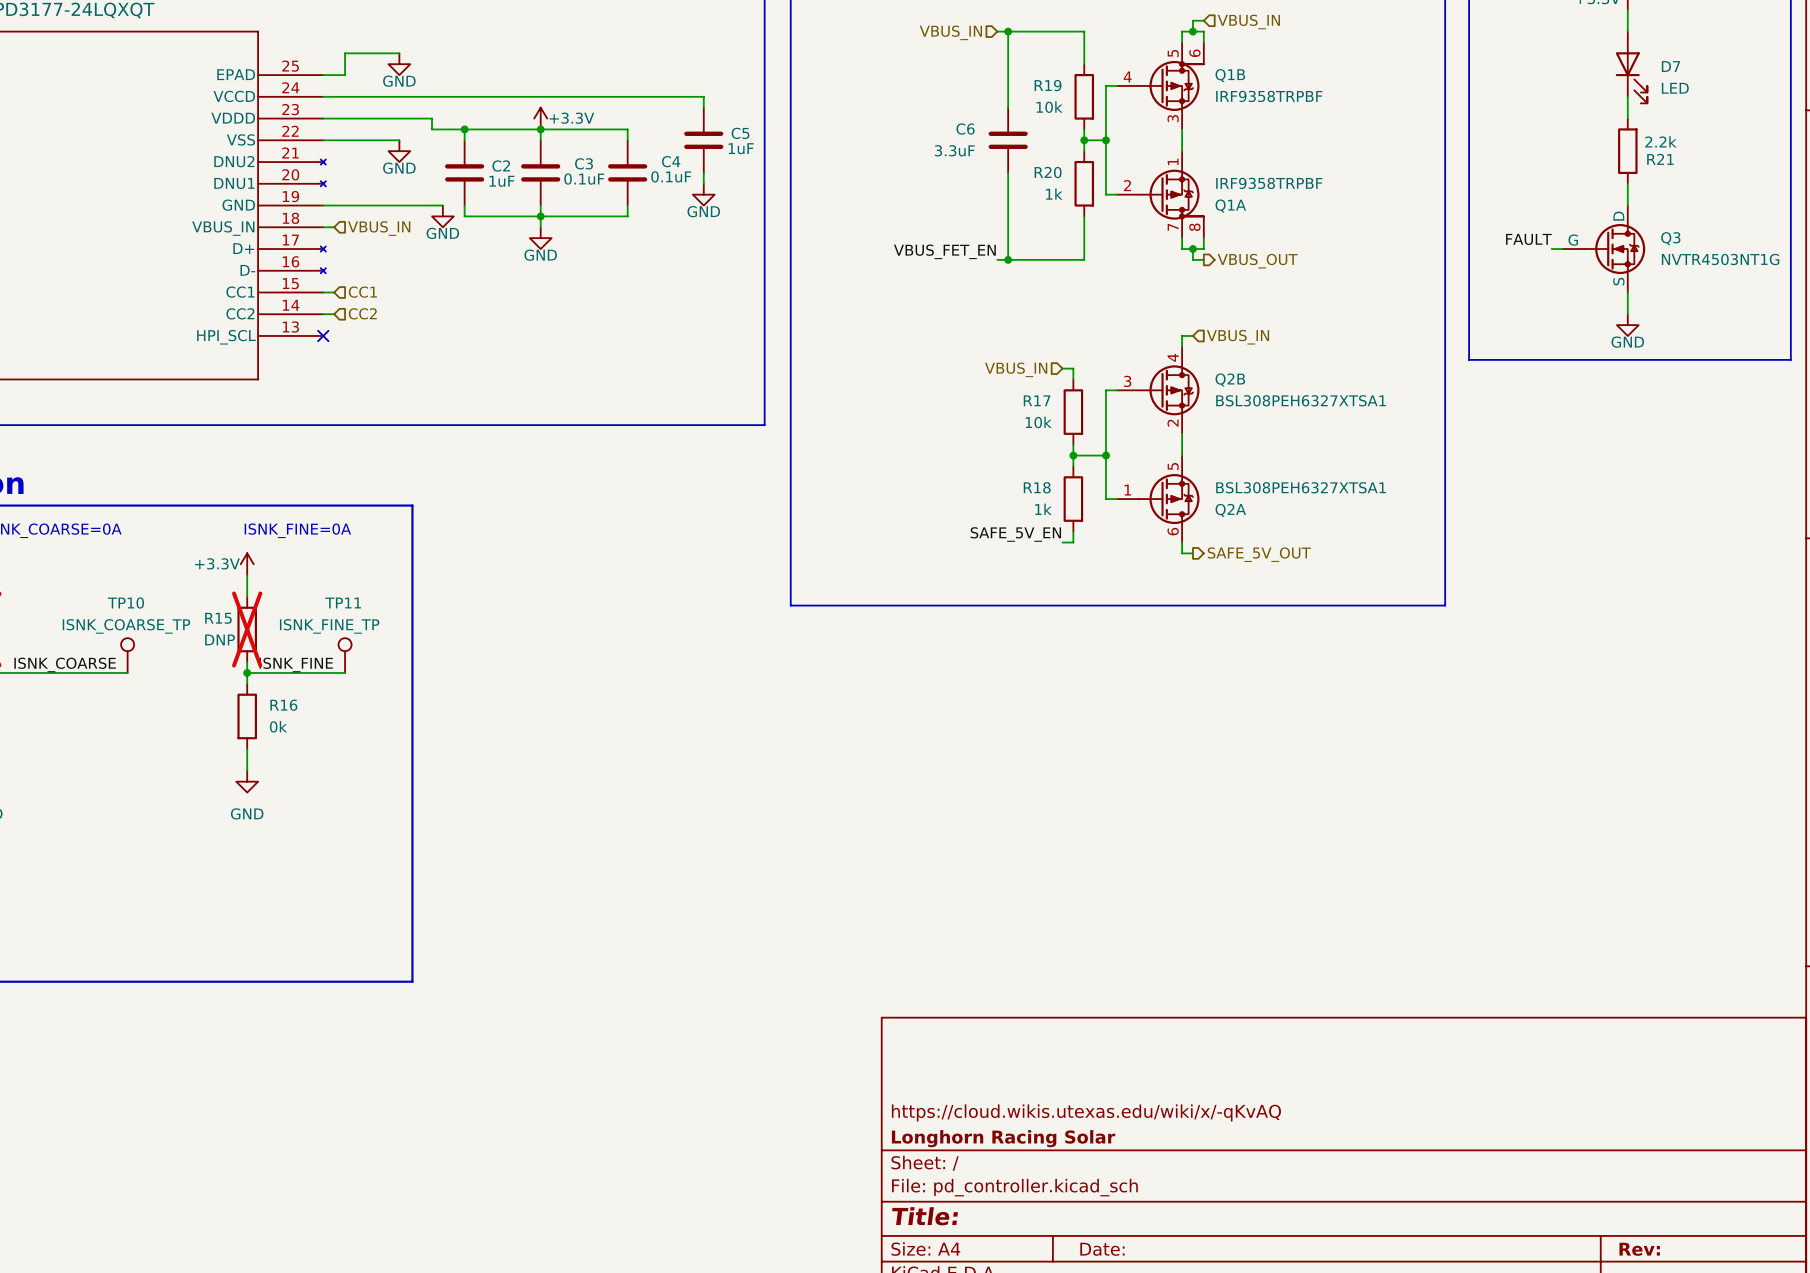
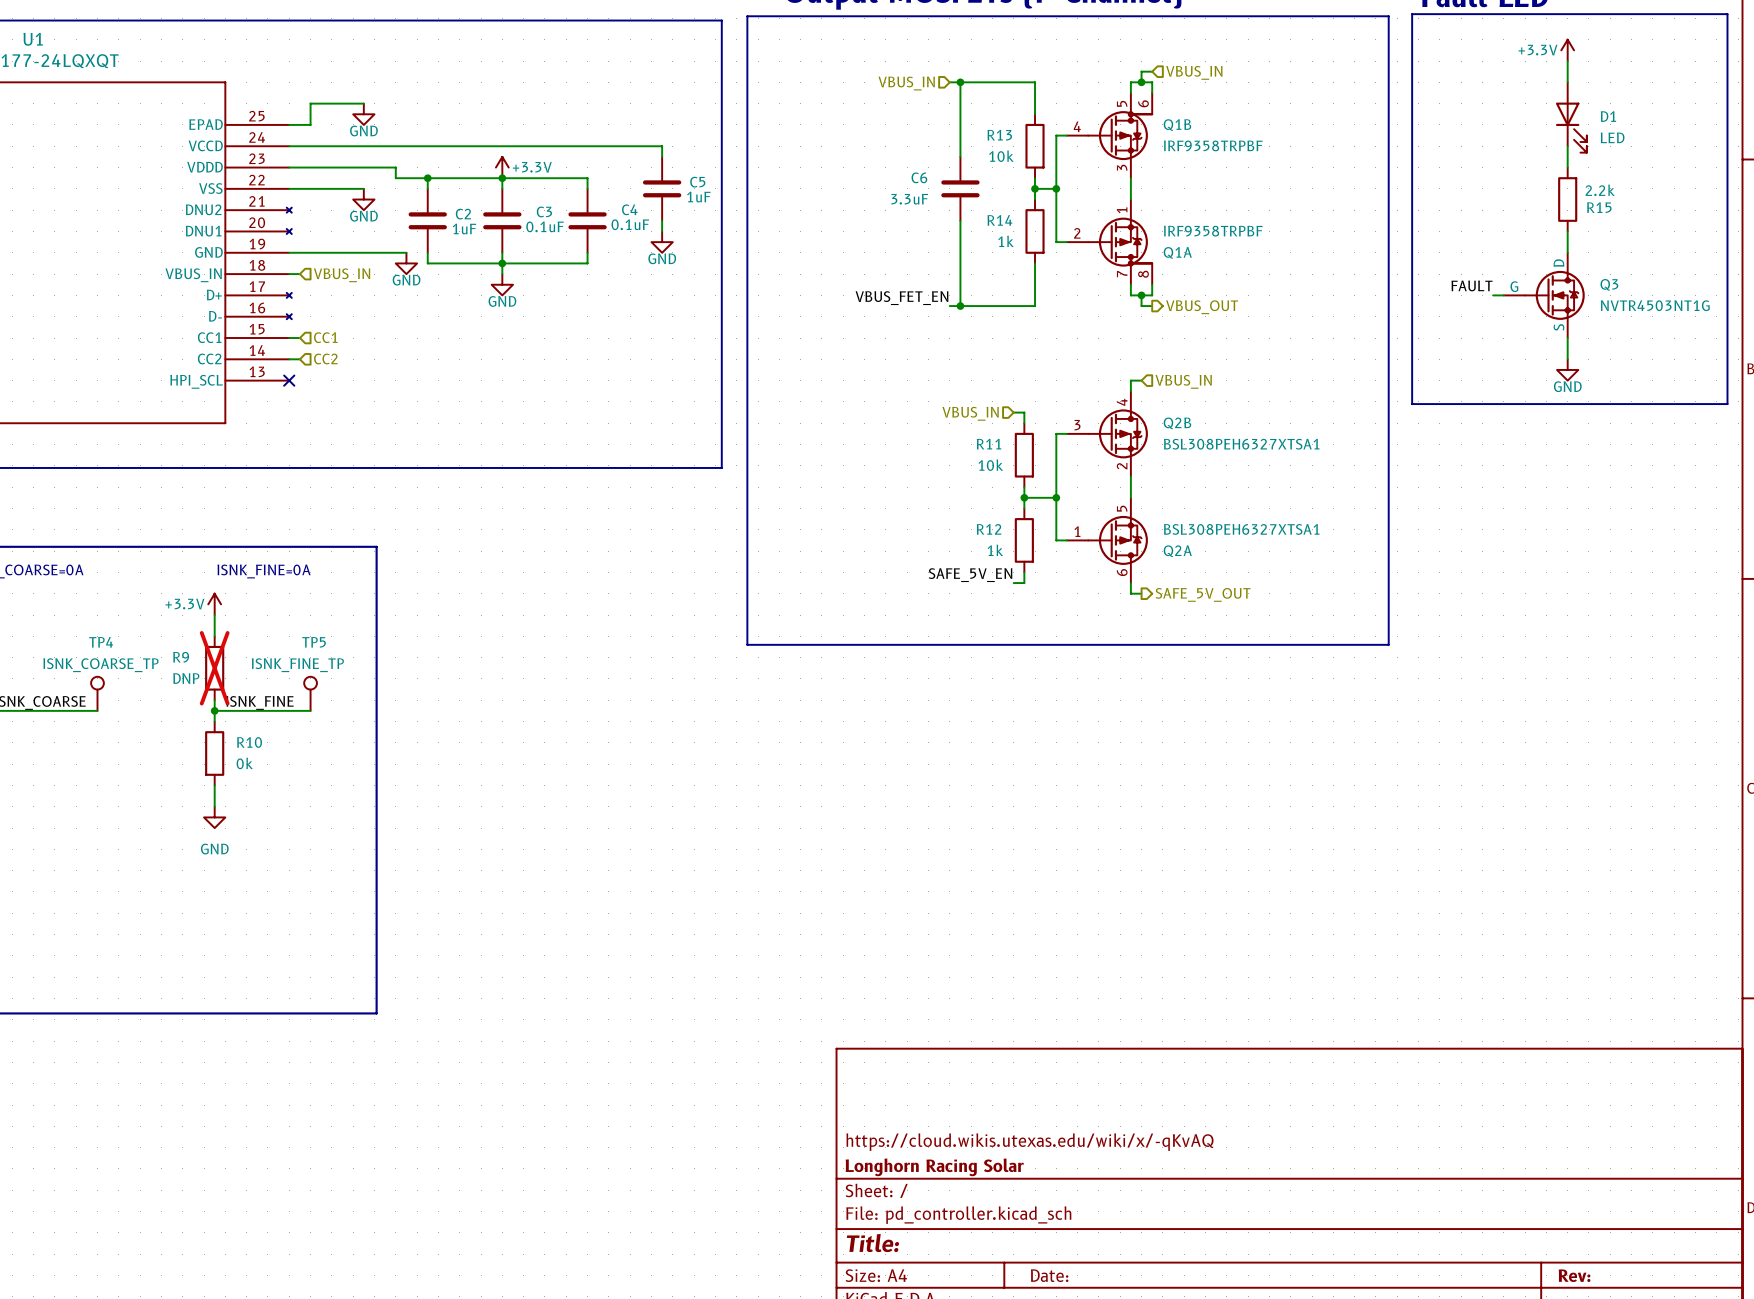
D7 name: D7 (1670, 66) -> D1 (1608, 116)
R19 name: R19 (1048, 85) -> R13 (999, 135)
R21 name: R21 (1660, 159) -> R15 (1599, 207)
R20 name: R20 (1048, 172) -> R14 (999, 220)
R17 name: R17 (1037, 400) -> R11 (989, 444)
R18 name: R18 (1037, 487) -> R12 (989, 529)
TP10 name: TP10 (125, 603) -> TP4 (101, 642)
TP11 name: TP11 (343, 603) -> TP5 (314, 642)
R15 name: R15 (218, 618) -> R9 (181, 657)
R16 name: R16 (283, 705) -> R10 (249, 742)

